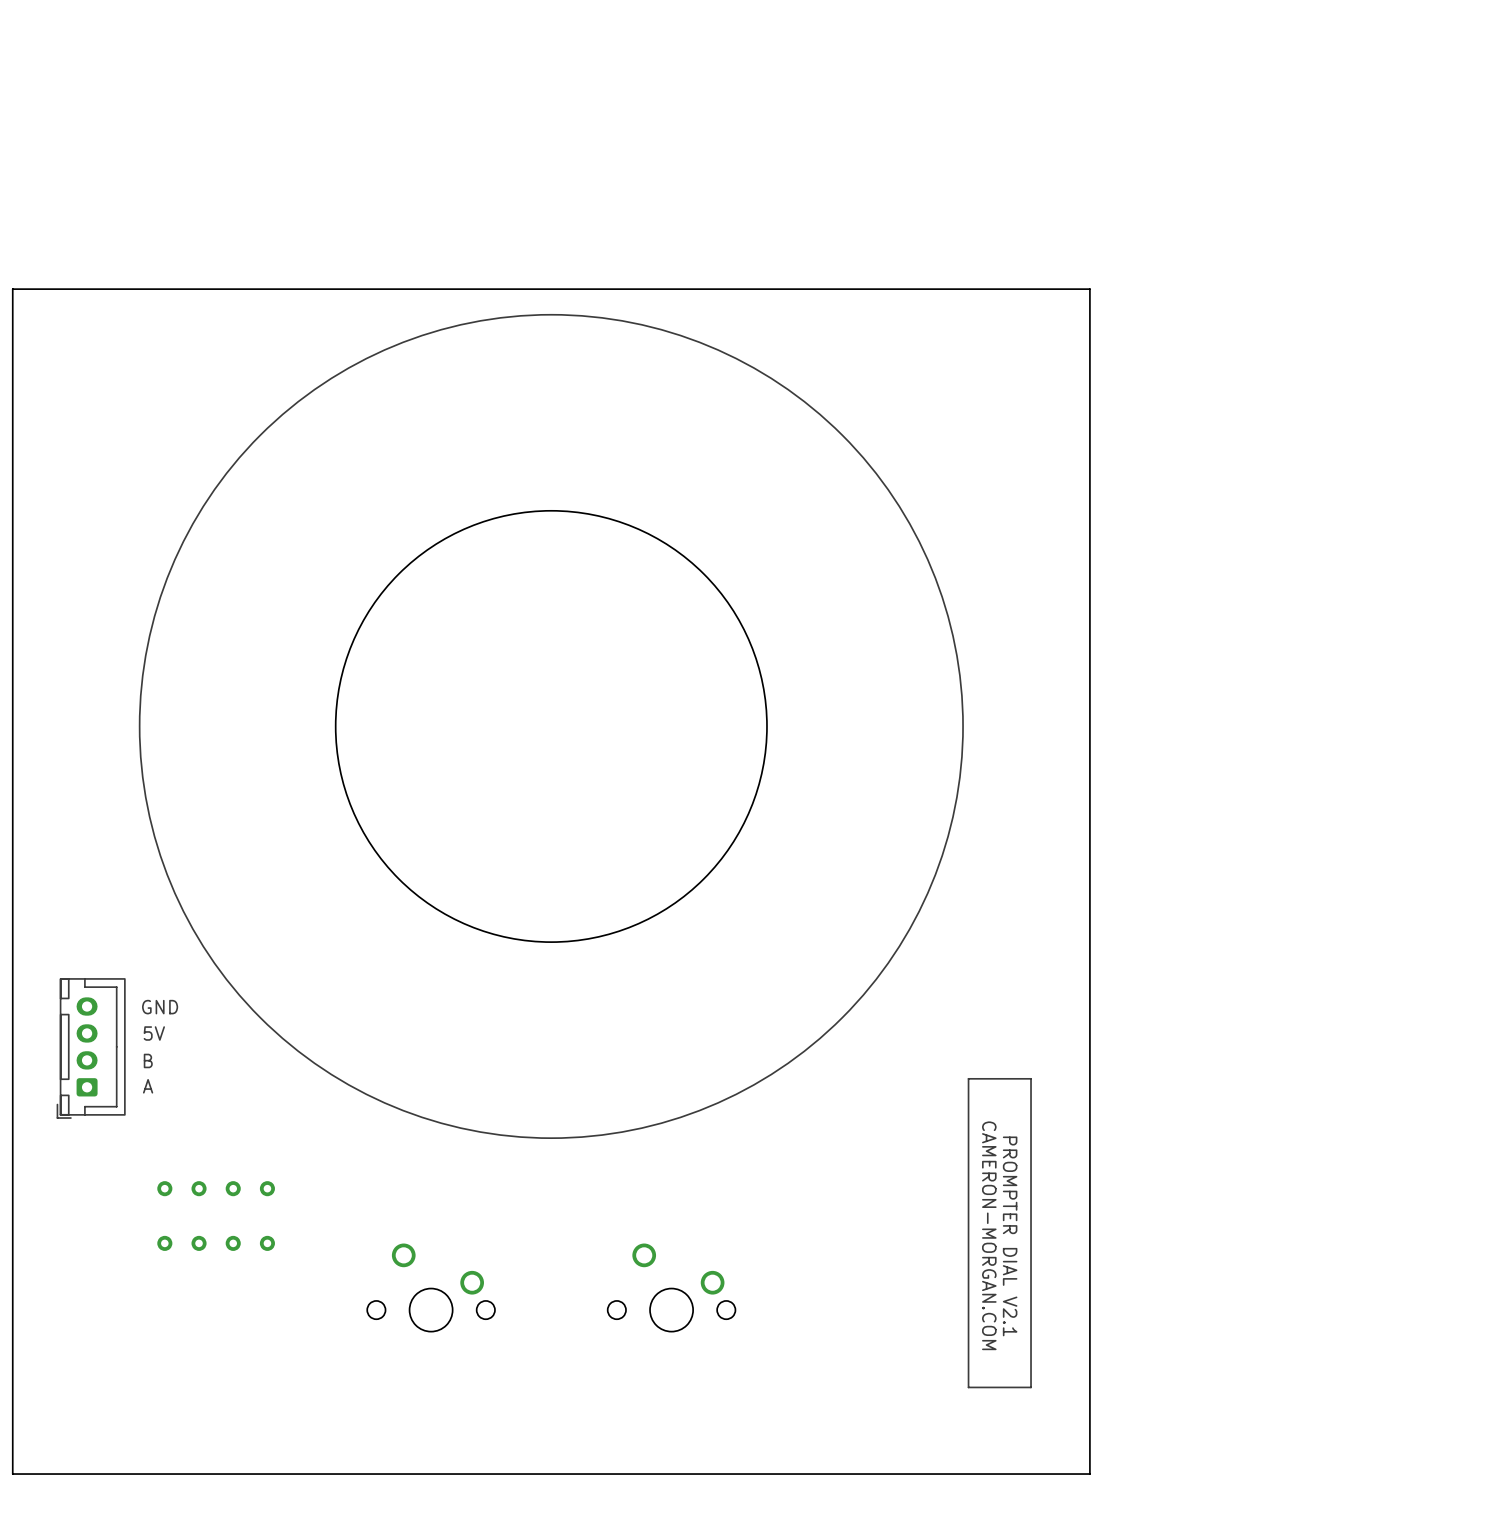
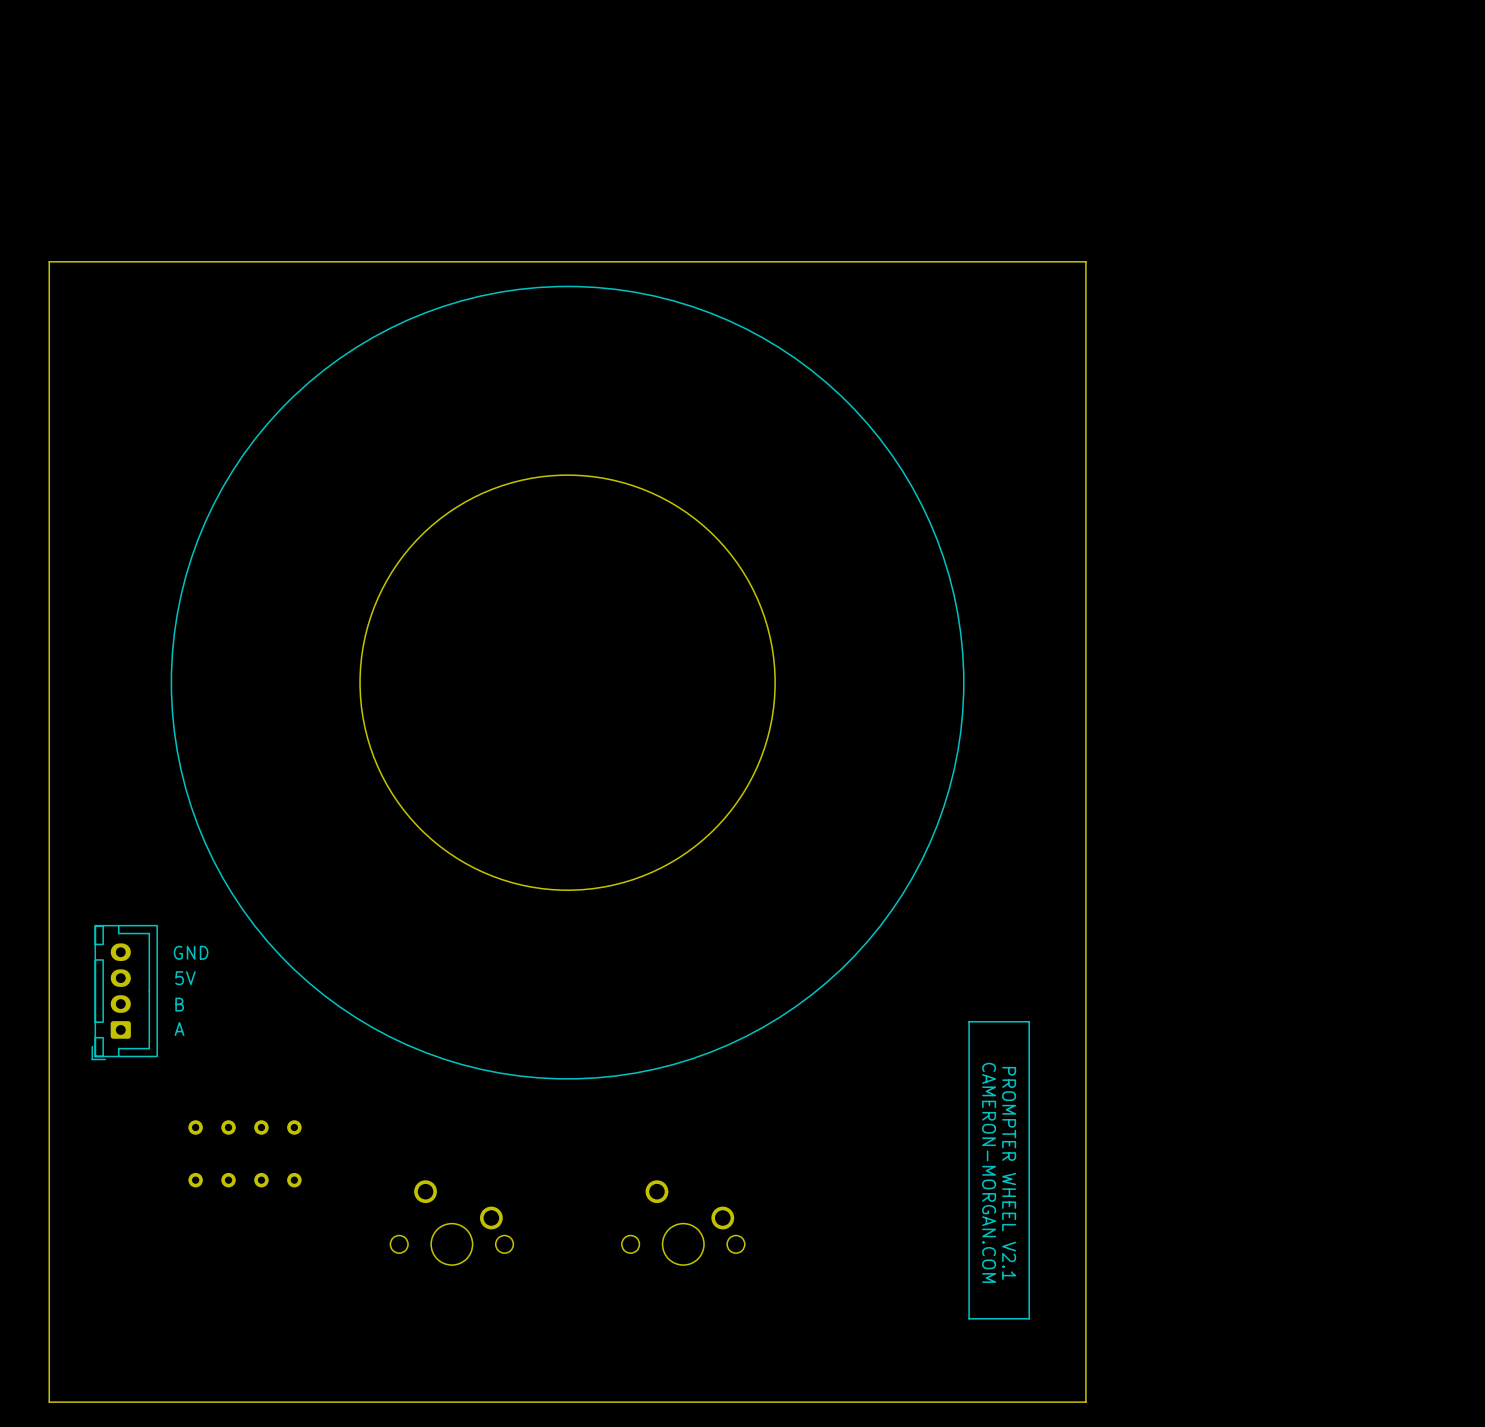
text: PROMPTER DIAL V2.1 (1010, 1236) -> PROMPTER WHEEL V2.1 (1009, 1173)

